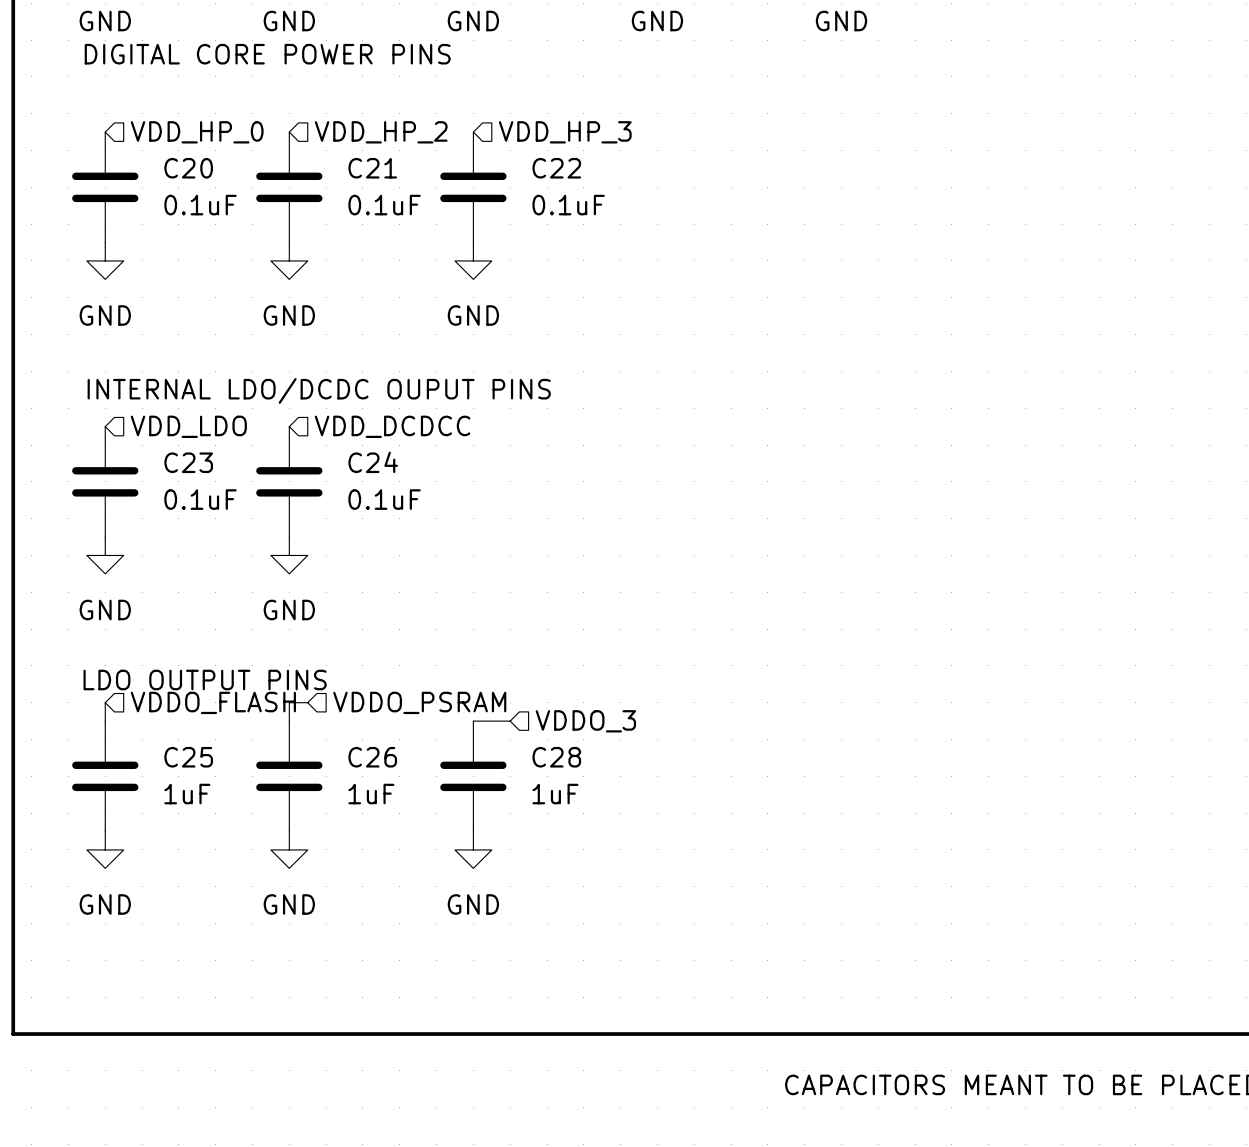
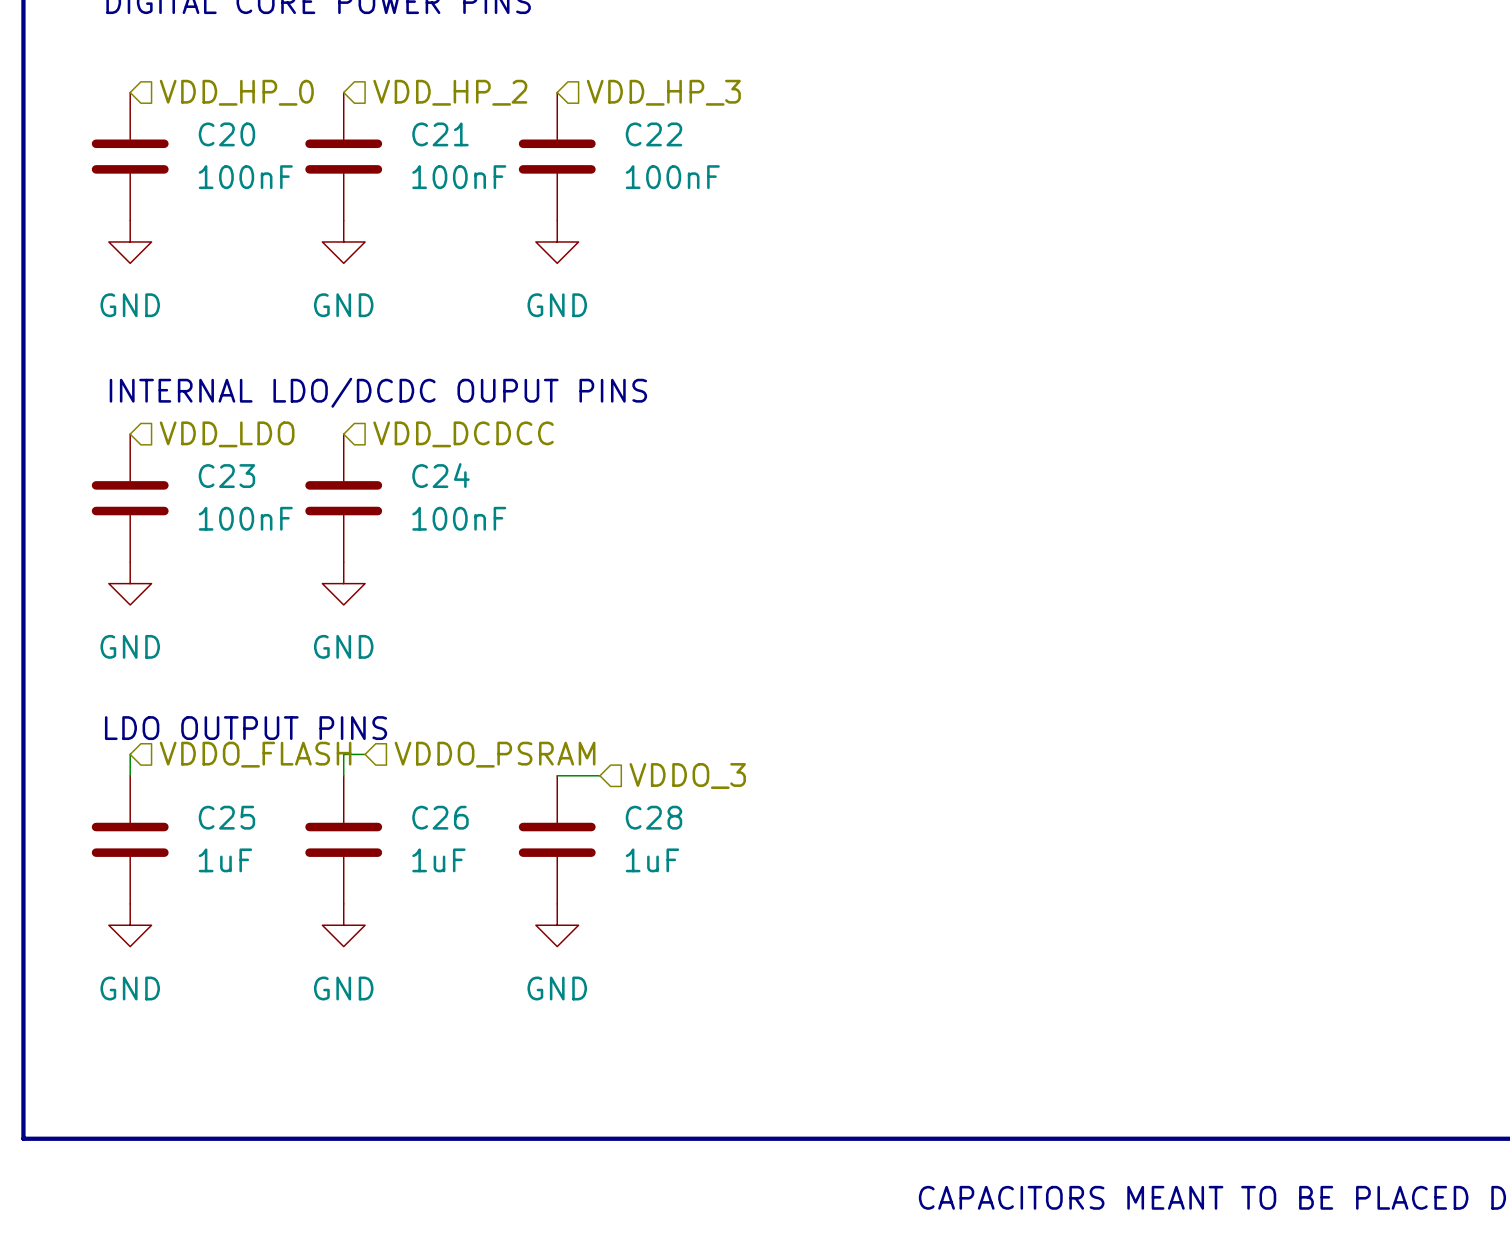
C20 value: 0.1uF (200, 205) -> 100nF (245, 177)
C21 value: 0.1uF (384, 205) -> 100nF (459, 177)
C22 value: 0.1uF (568, 205) -> 100nF (672, 177)
C23 value: 0.1uF (200, 499) -> 100nF (245, 518)
C24 value: 0.1uF (384, 499) -> 100nF (459, 518)

